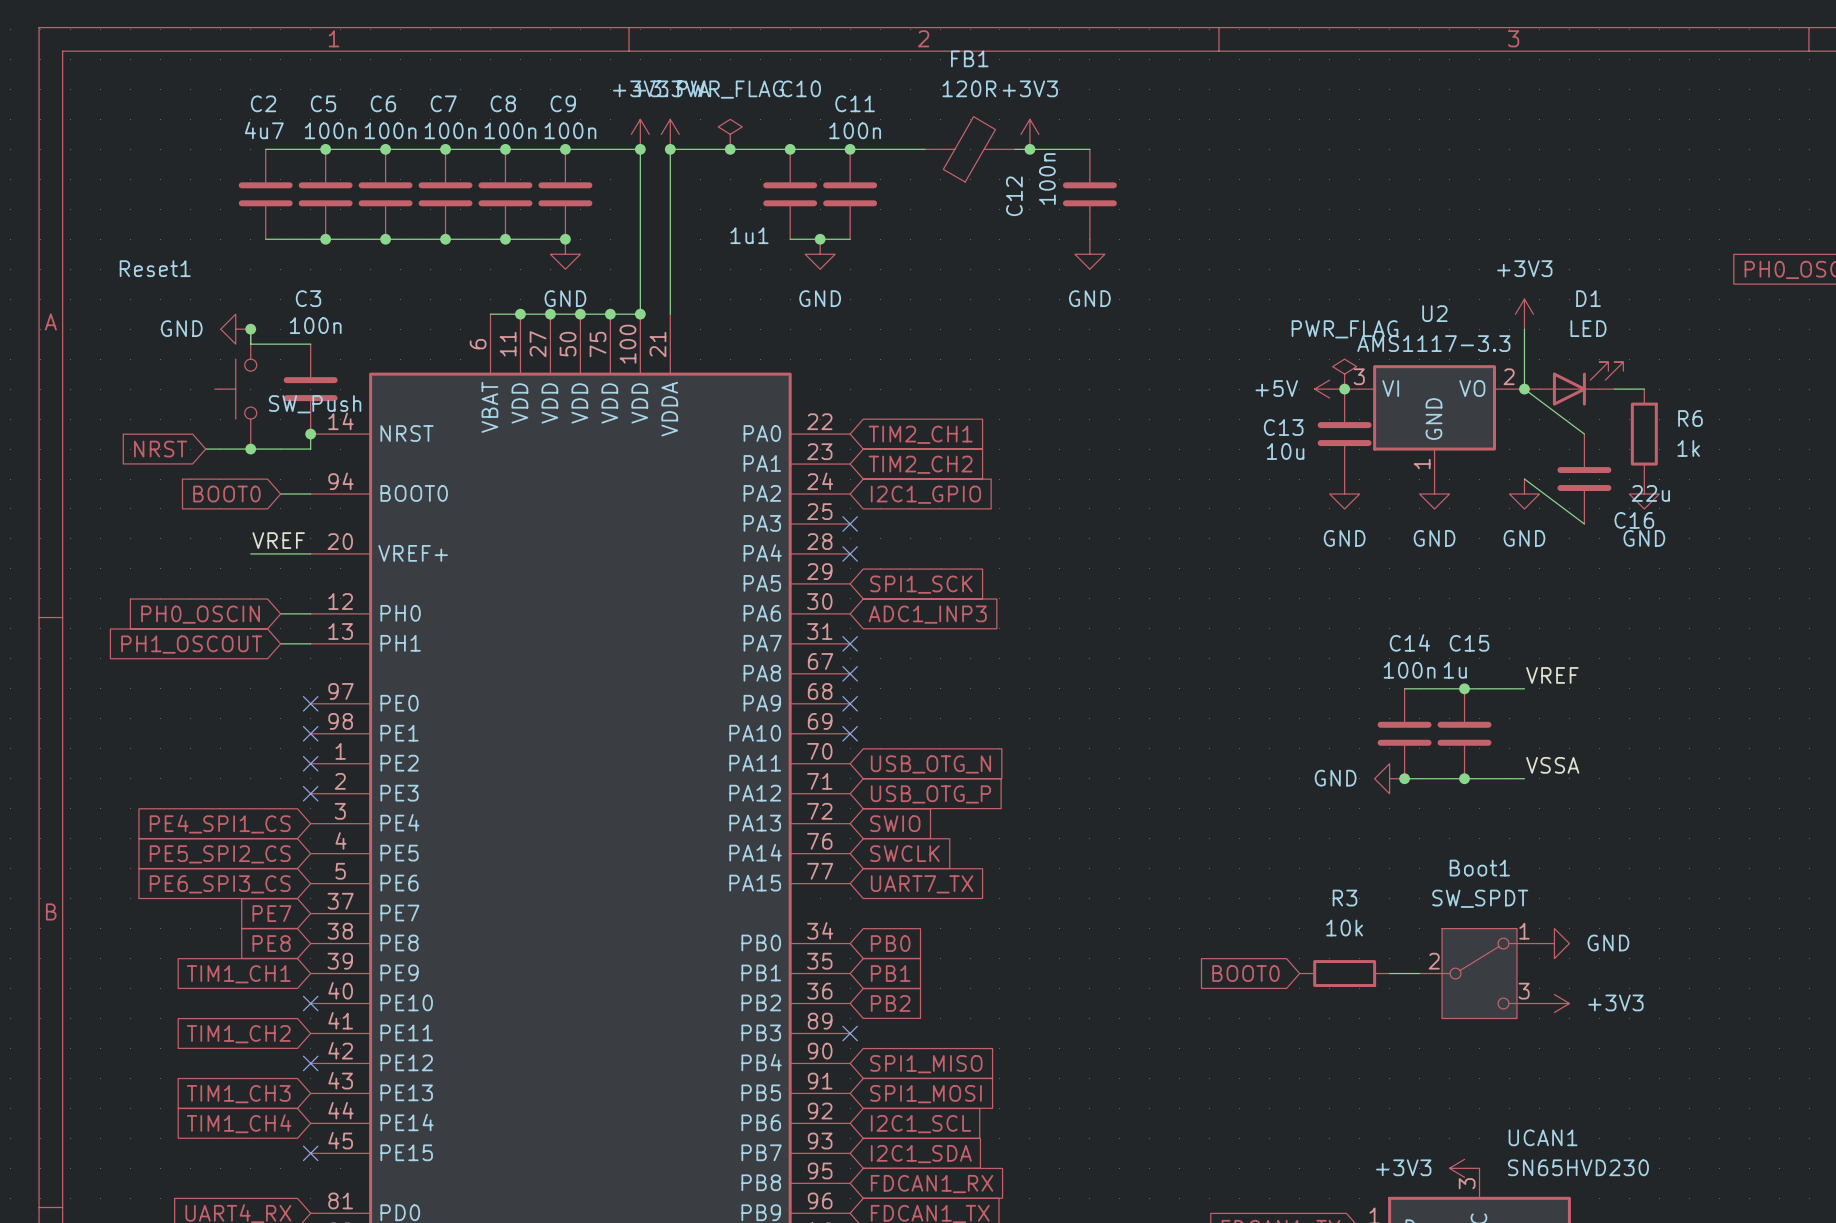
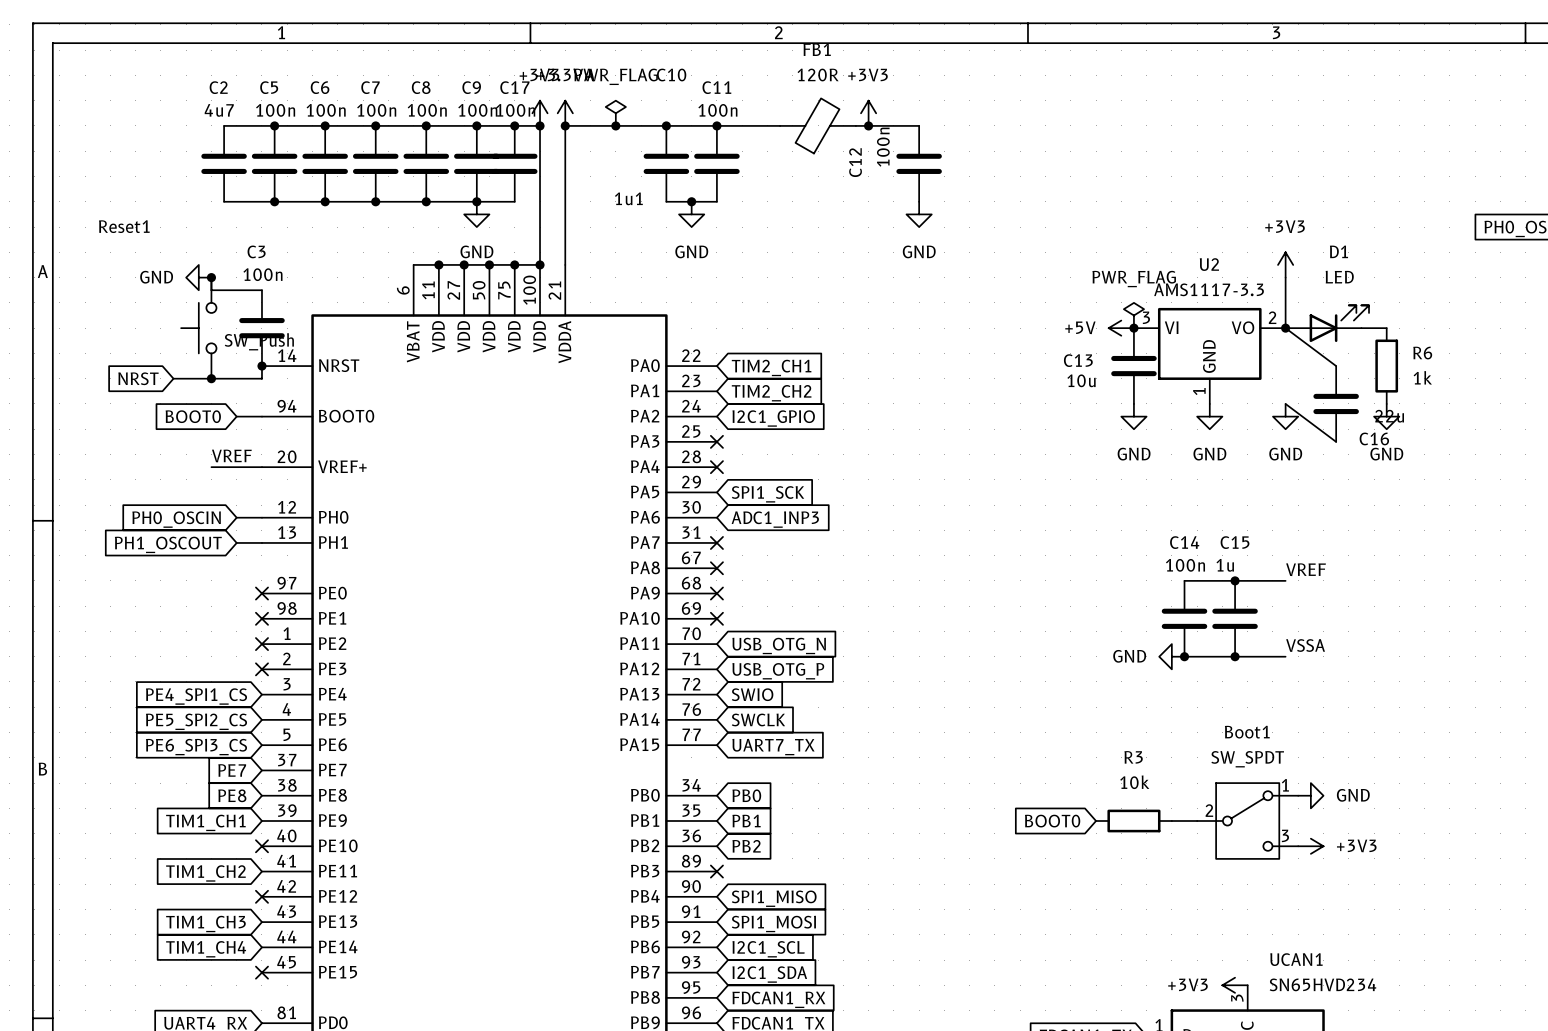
junction: none -> (514, 125)
C17: none -> 100n (514, 163)
wire: none -> (476, 201) (514, 201)
UCAN1 value: SN65HVD230 (1578, 1167) -> SN65HVD234 (1322, 984)

